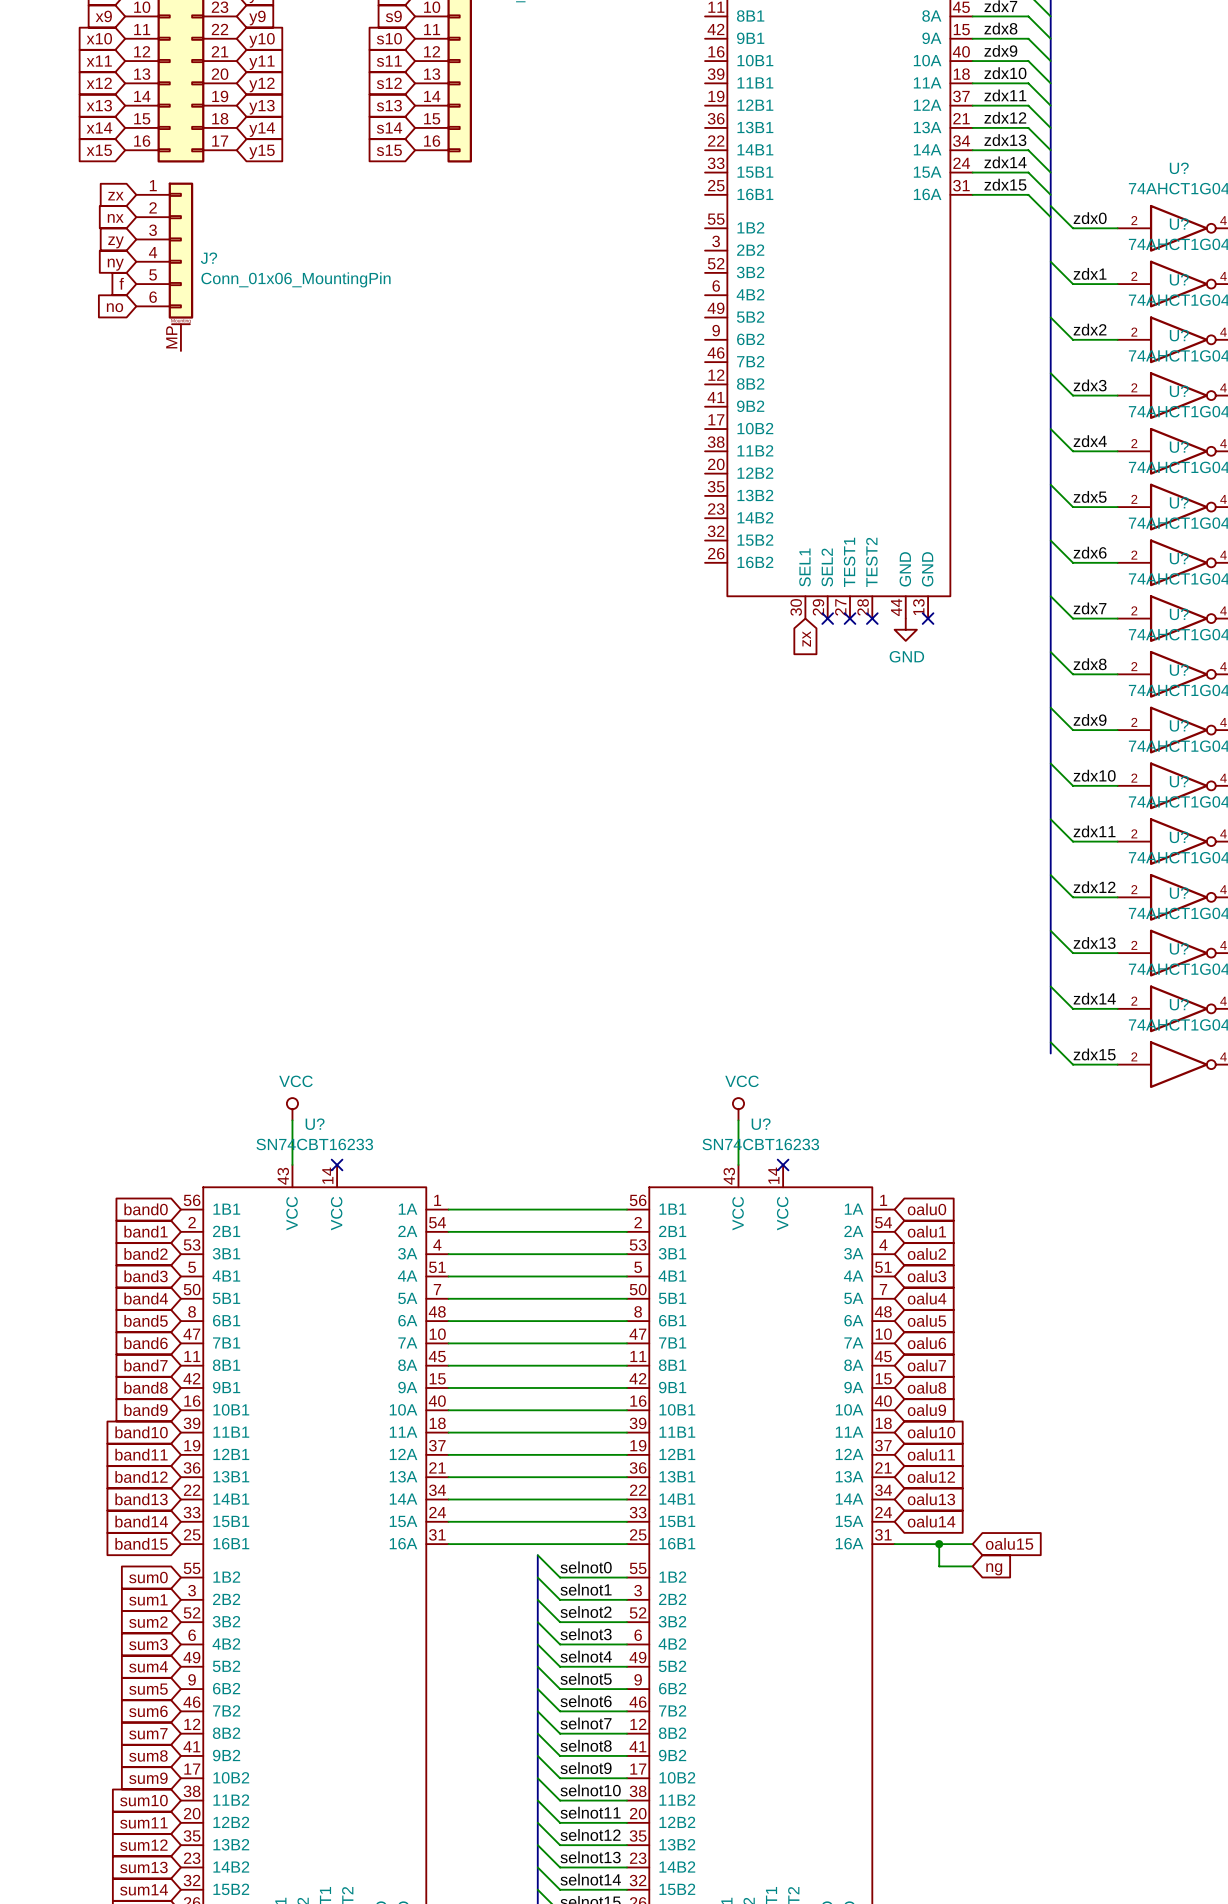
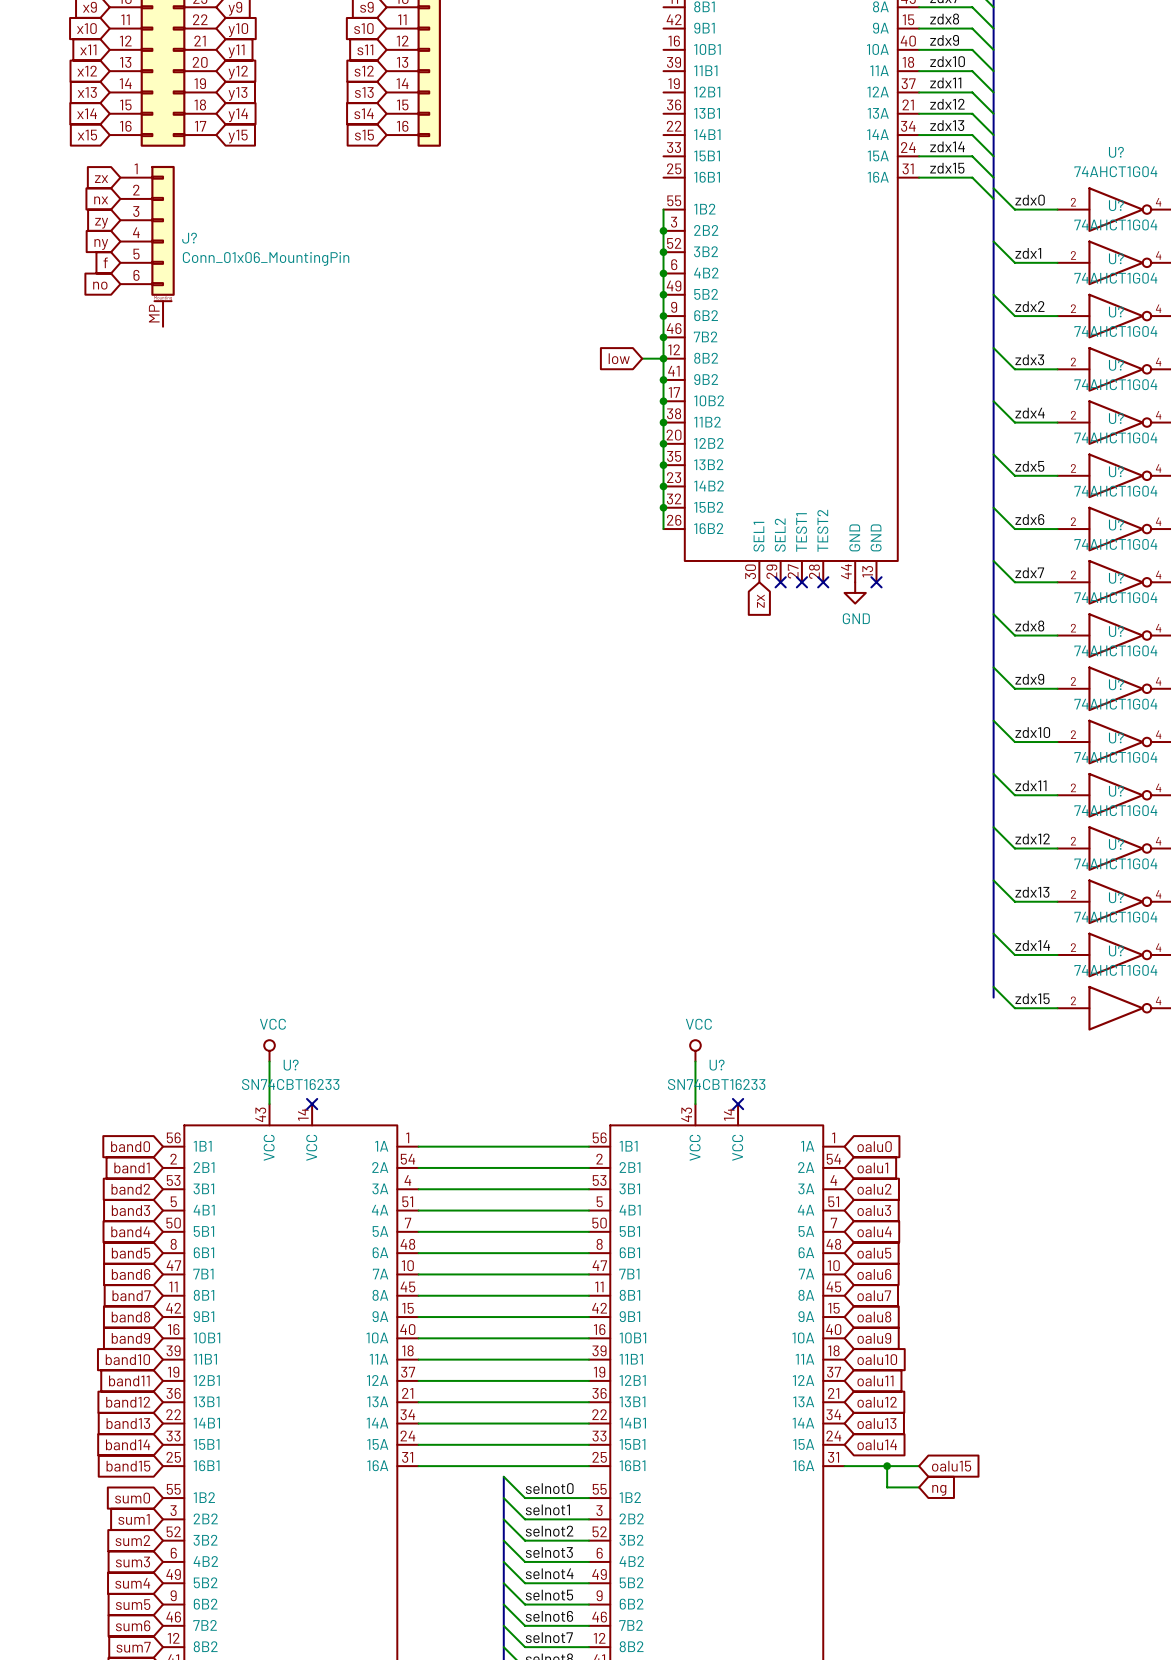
wire: none -> (663, 209) (663, 529)
junction: none -> (663, 230)
junction: none -> (663, 252)
junction: none -> (663, 273)
junction: none -> (663, 294)
junction: none -> (663, 316)
junction: none -> (663, 337)
global label: none -> low (619, 358)
wire: none -> (642, 358) (663, 358)
junction: none -> (663, 358)
junction: none -> (663, 379)
junction: none -> (663, 401)
junction: none -> (663, 422)
junction: none -> (663, 443)
junction: none -> (663, 465)
junction: none -> (663, 486)
junction: none -> (663, 507)

